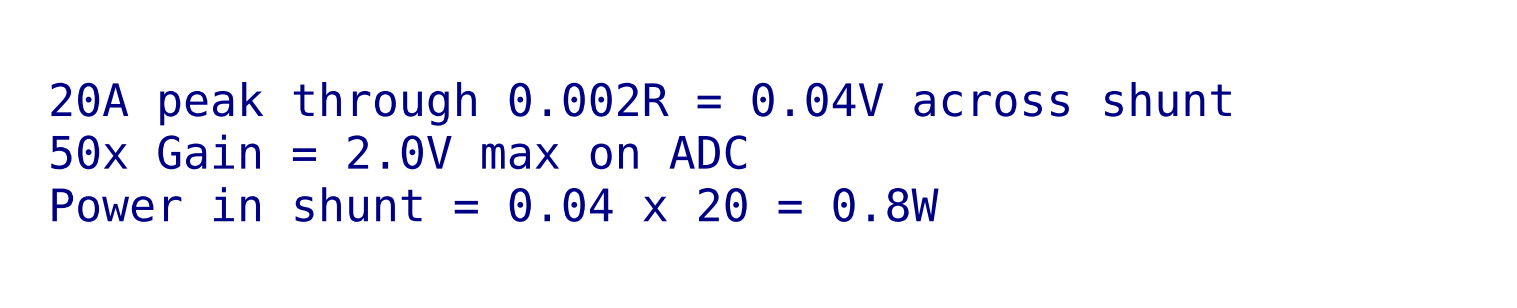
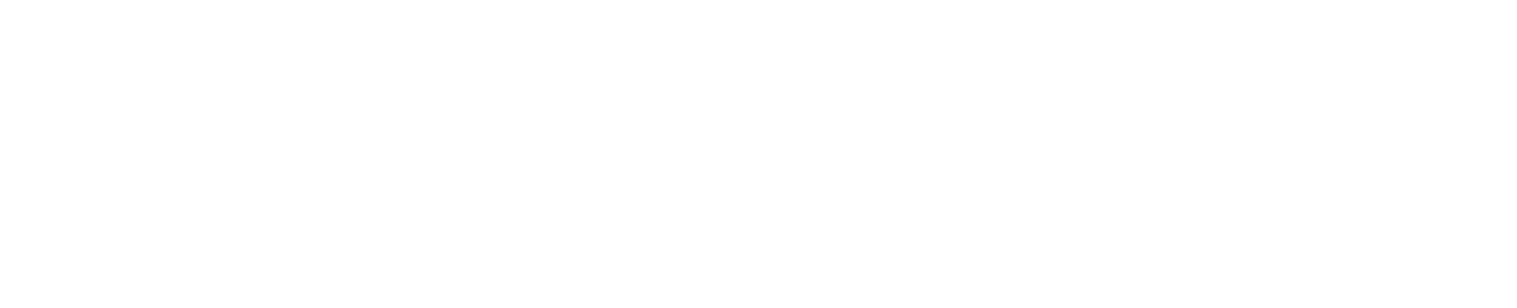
text: 20A peak through 0.002R = 0.04V across shunt (641, 103) -> none
text: 50x Gain = 2.0V max on ADC (398, 151) -> none
text: Power in shunt = 0.04 x 20 = 0.8W (495, 204) -> none

